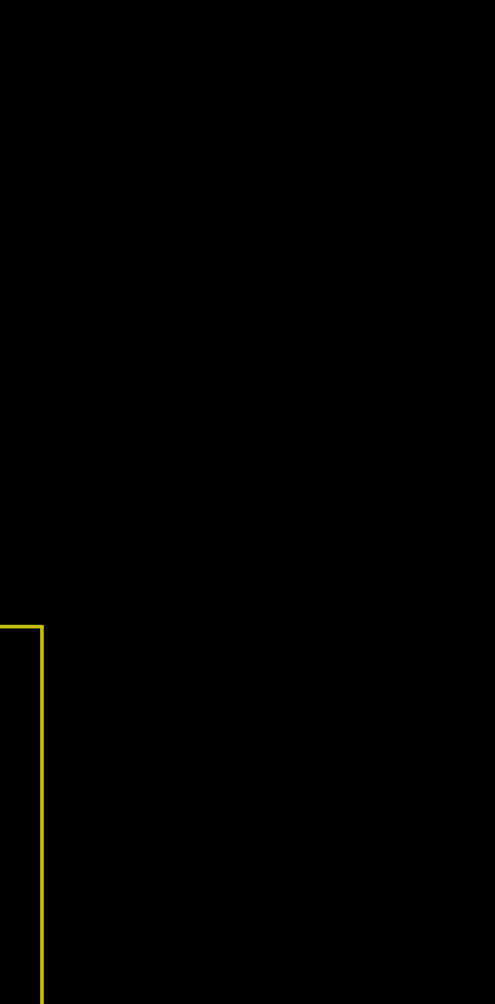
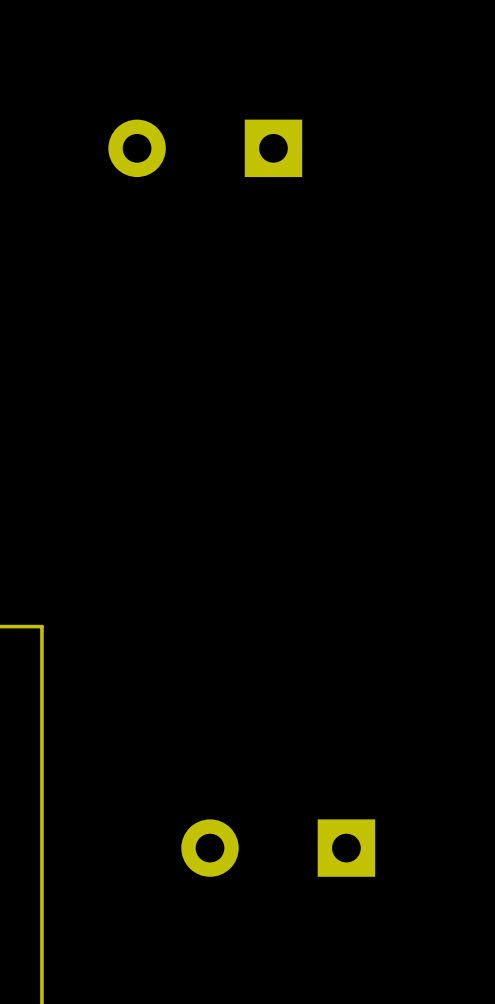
part: none -> (205, 148)
part: none -> (278, 848)

